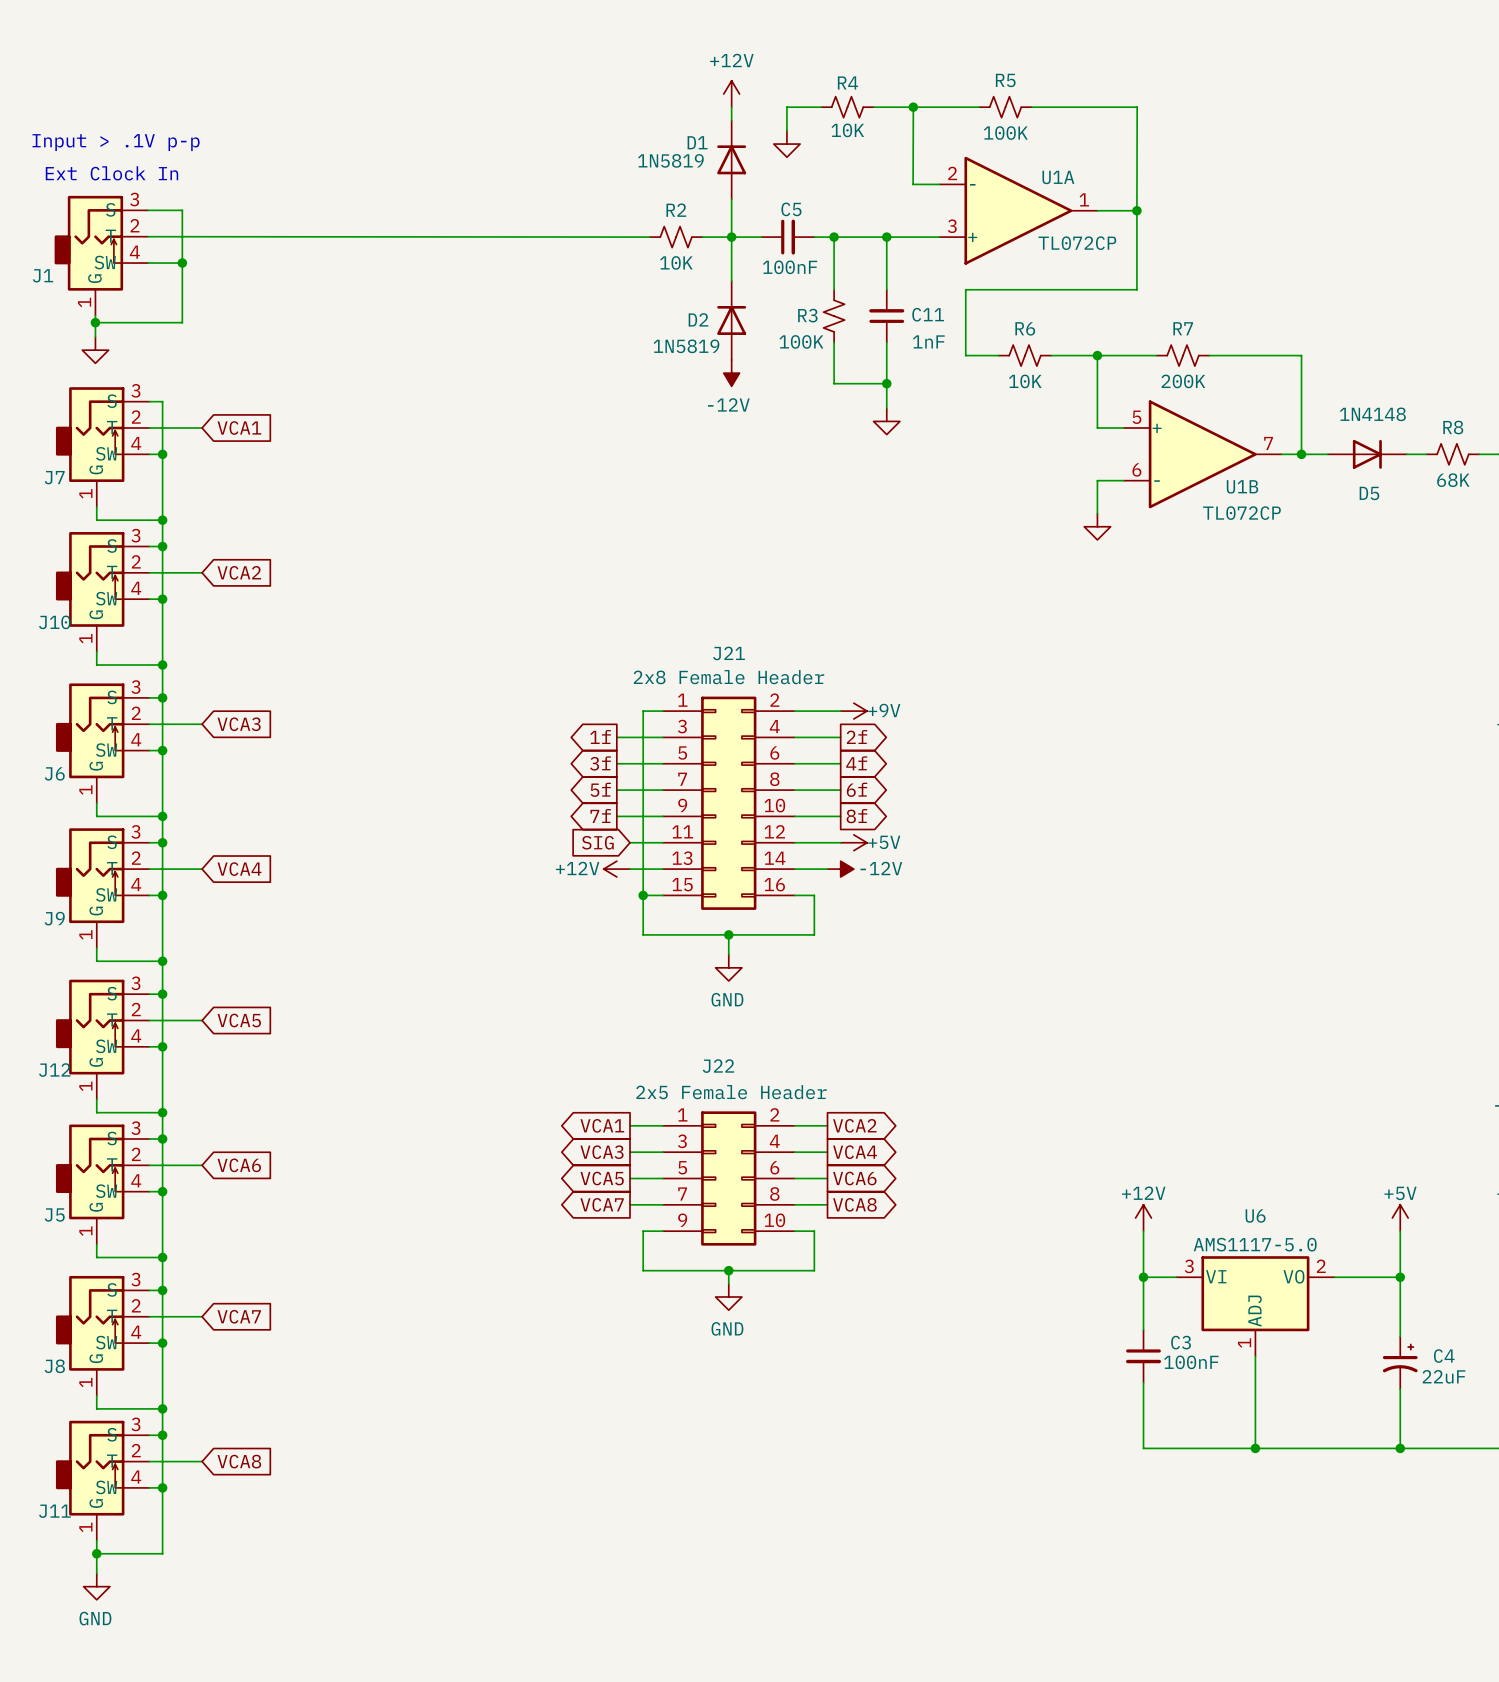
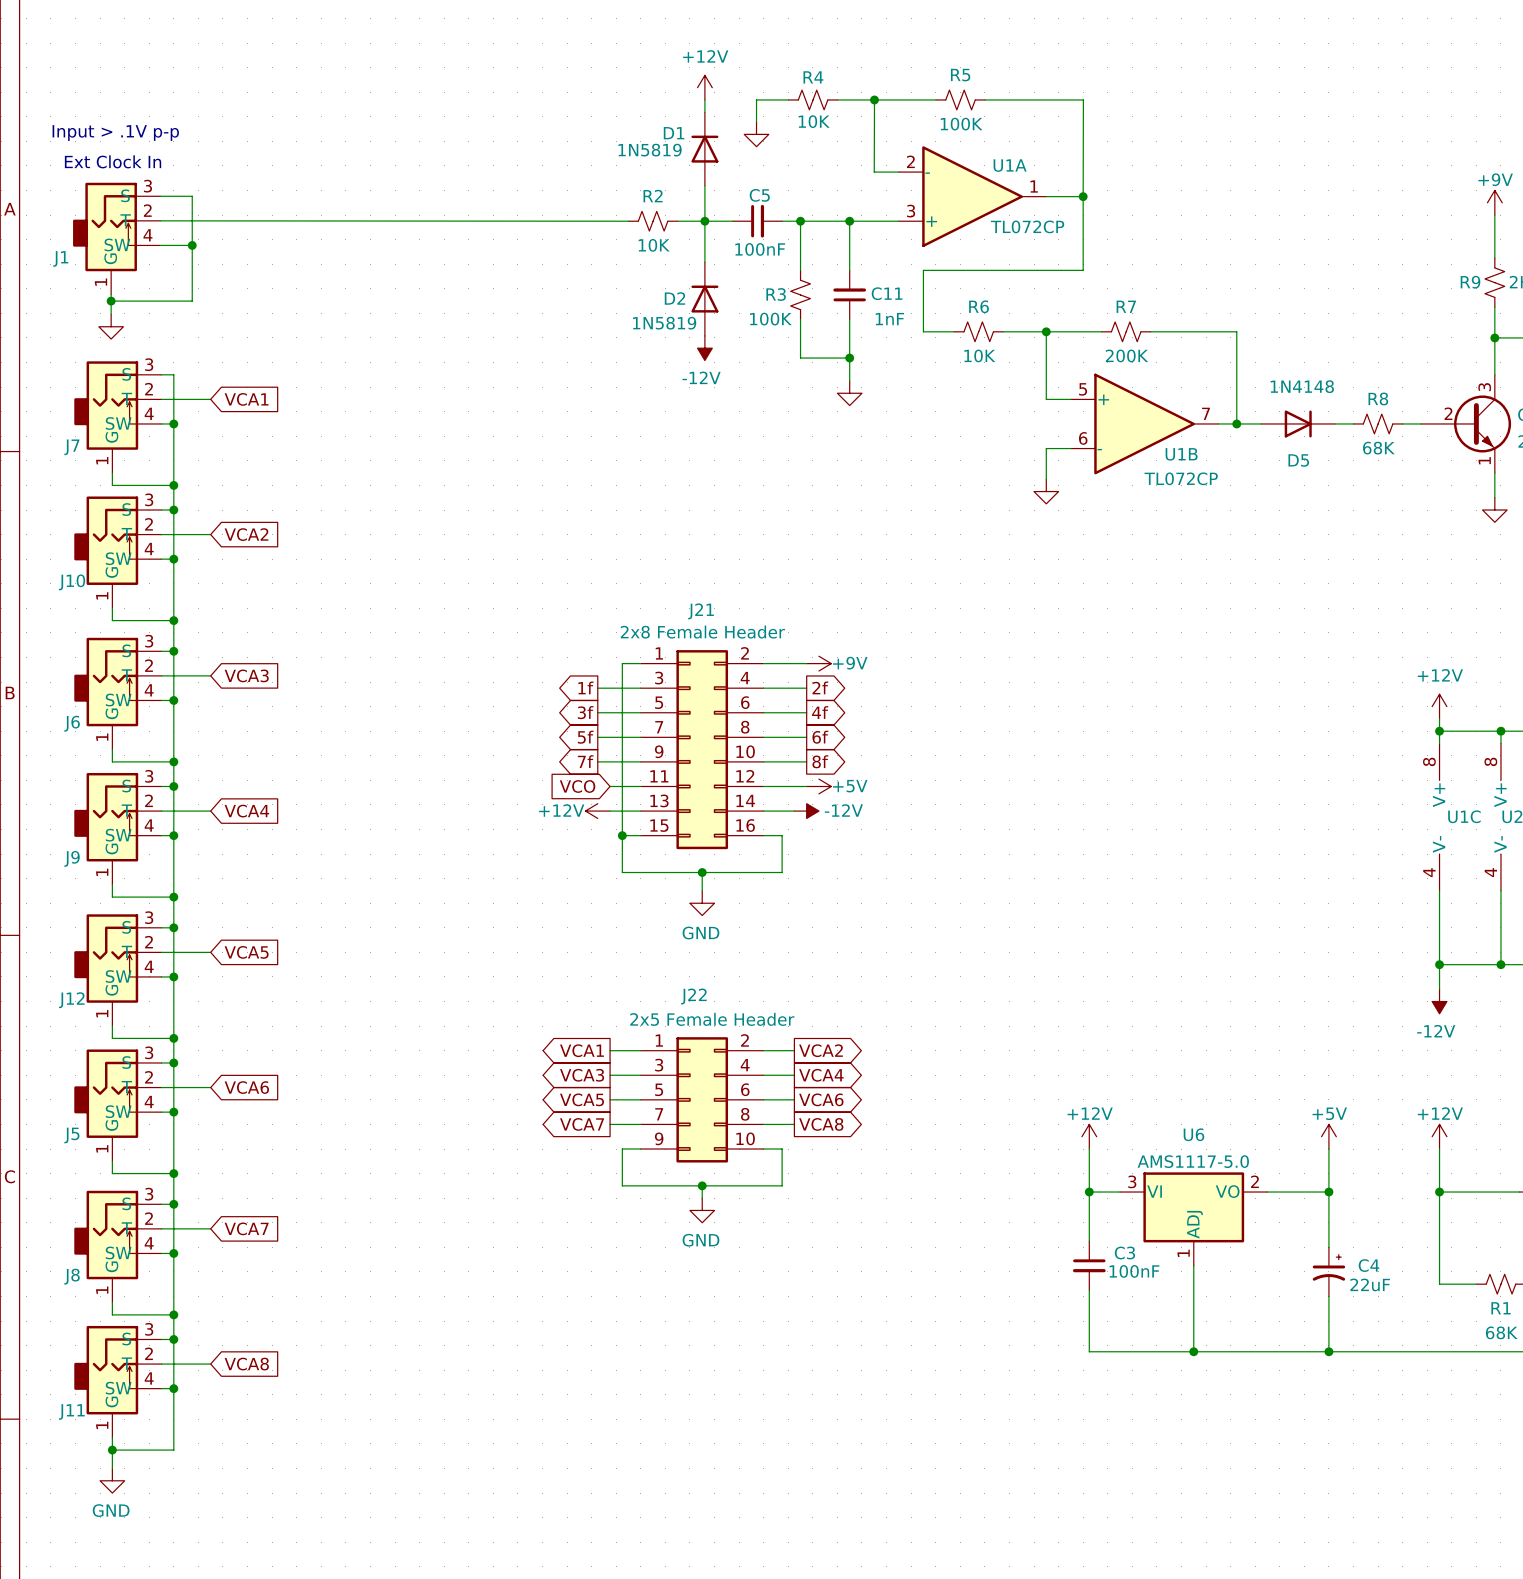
global label: SIG (597, 842) -> VCO (577, 786)

